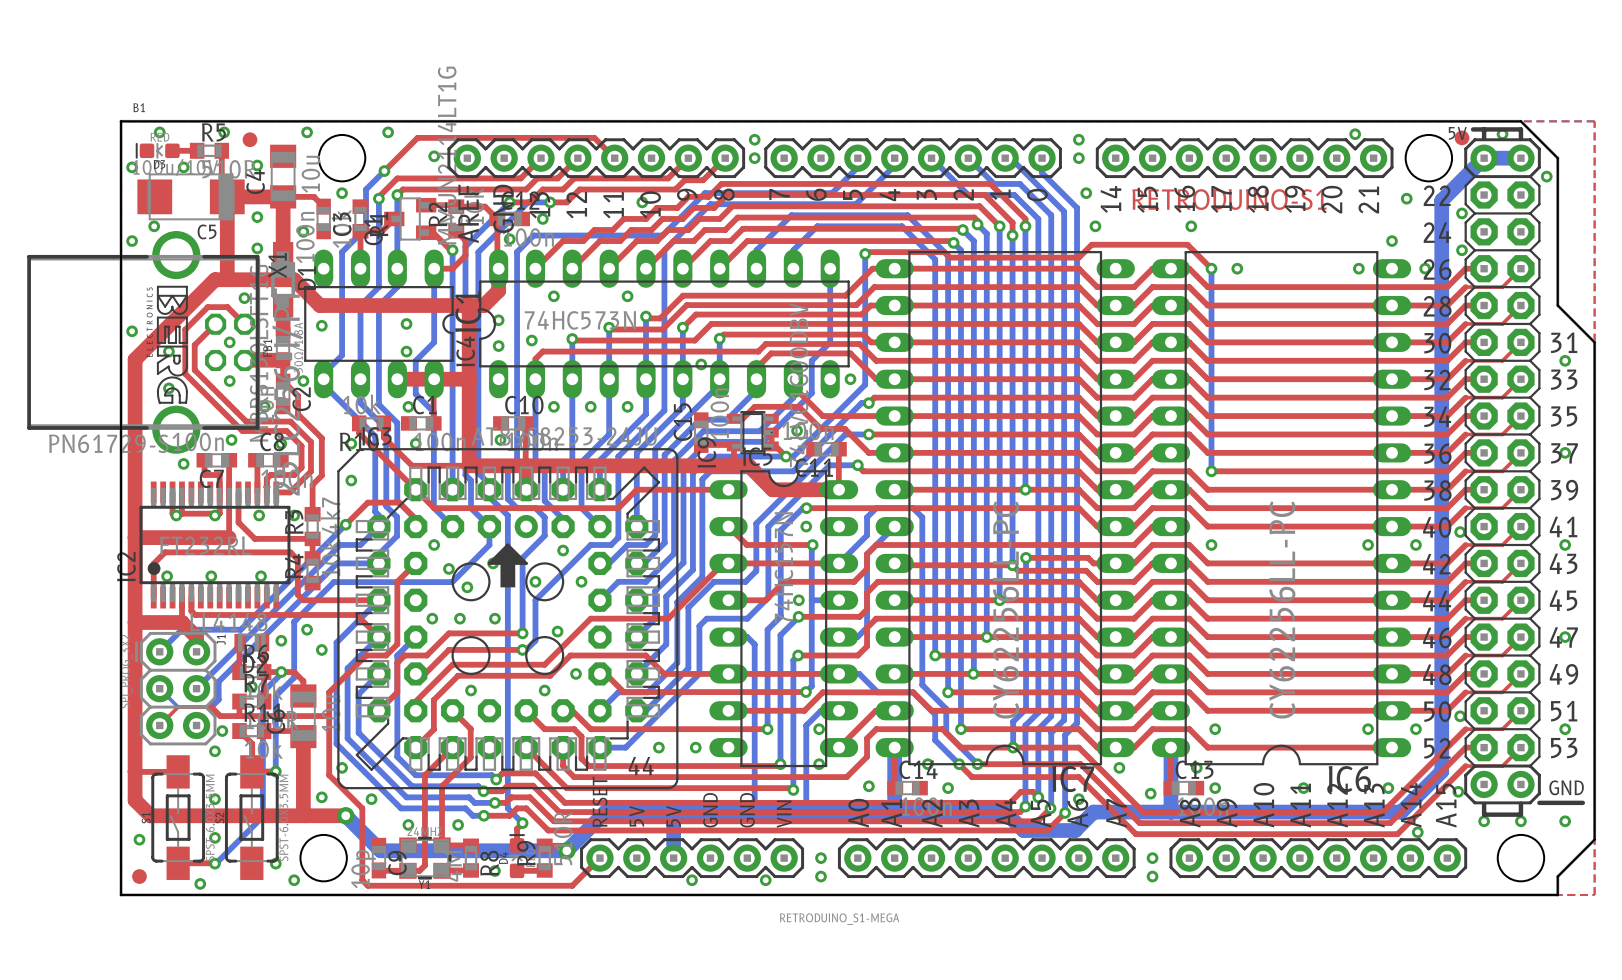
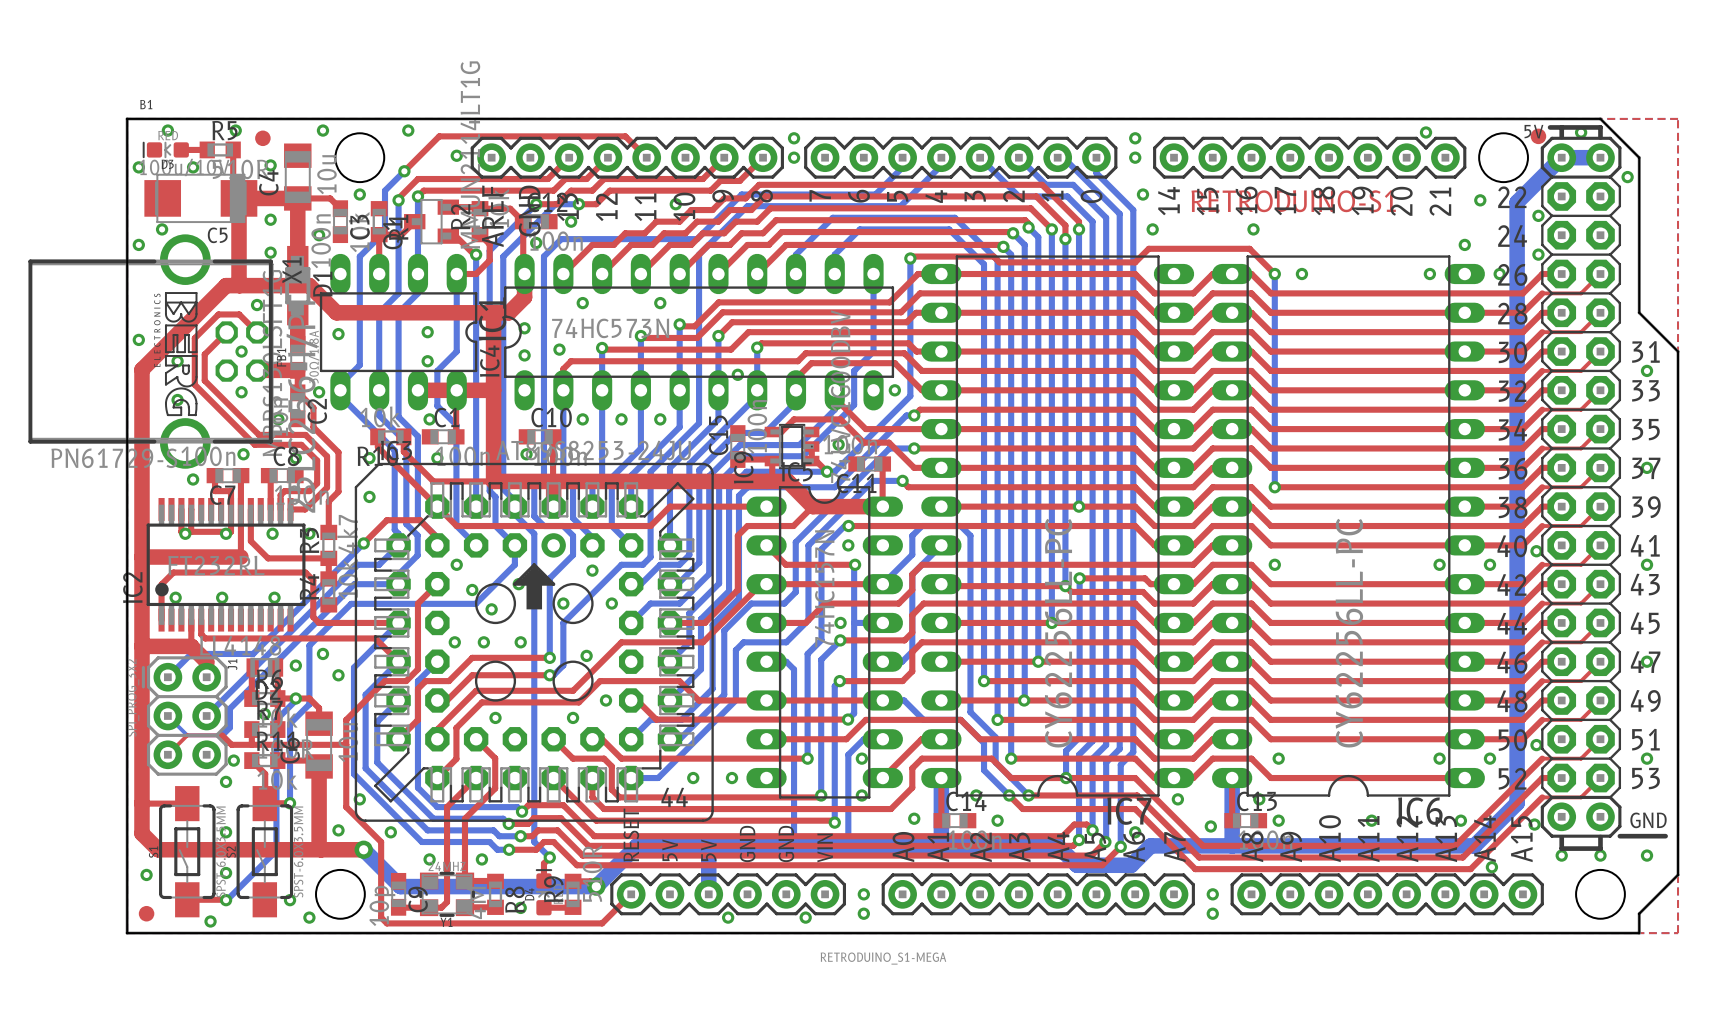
top track: none -> (812, 506) (793, 526) (747, 526) (737, 535) (737, 589) (704, 622) (669, 622)

